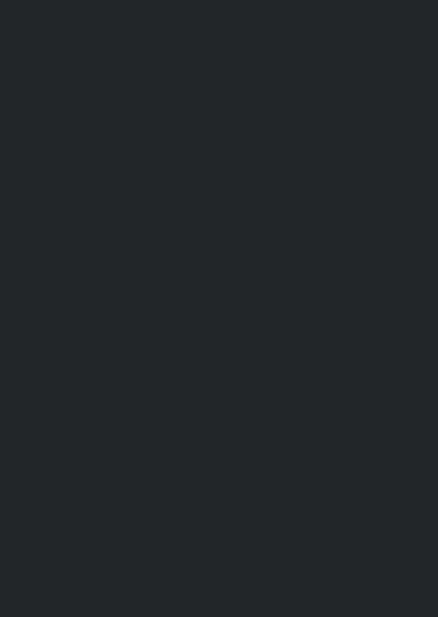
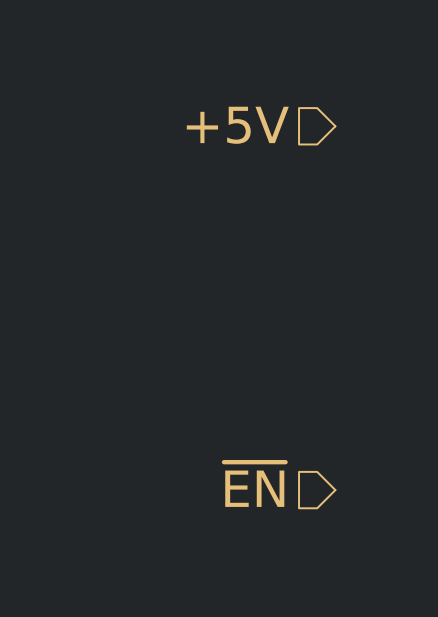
hierarchical label: none -> +5V (237, 125)
hierarchical label: none -> ~{EN} (254, 484)

